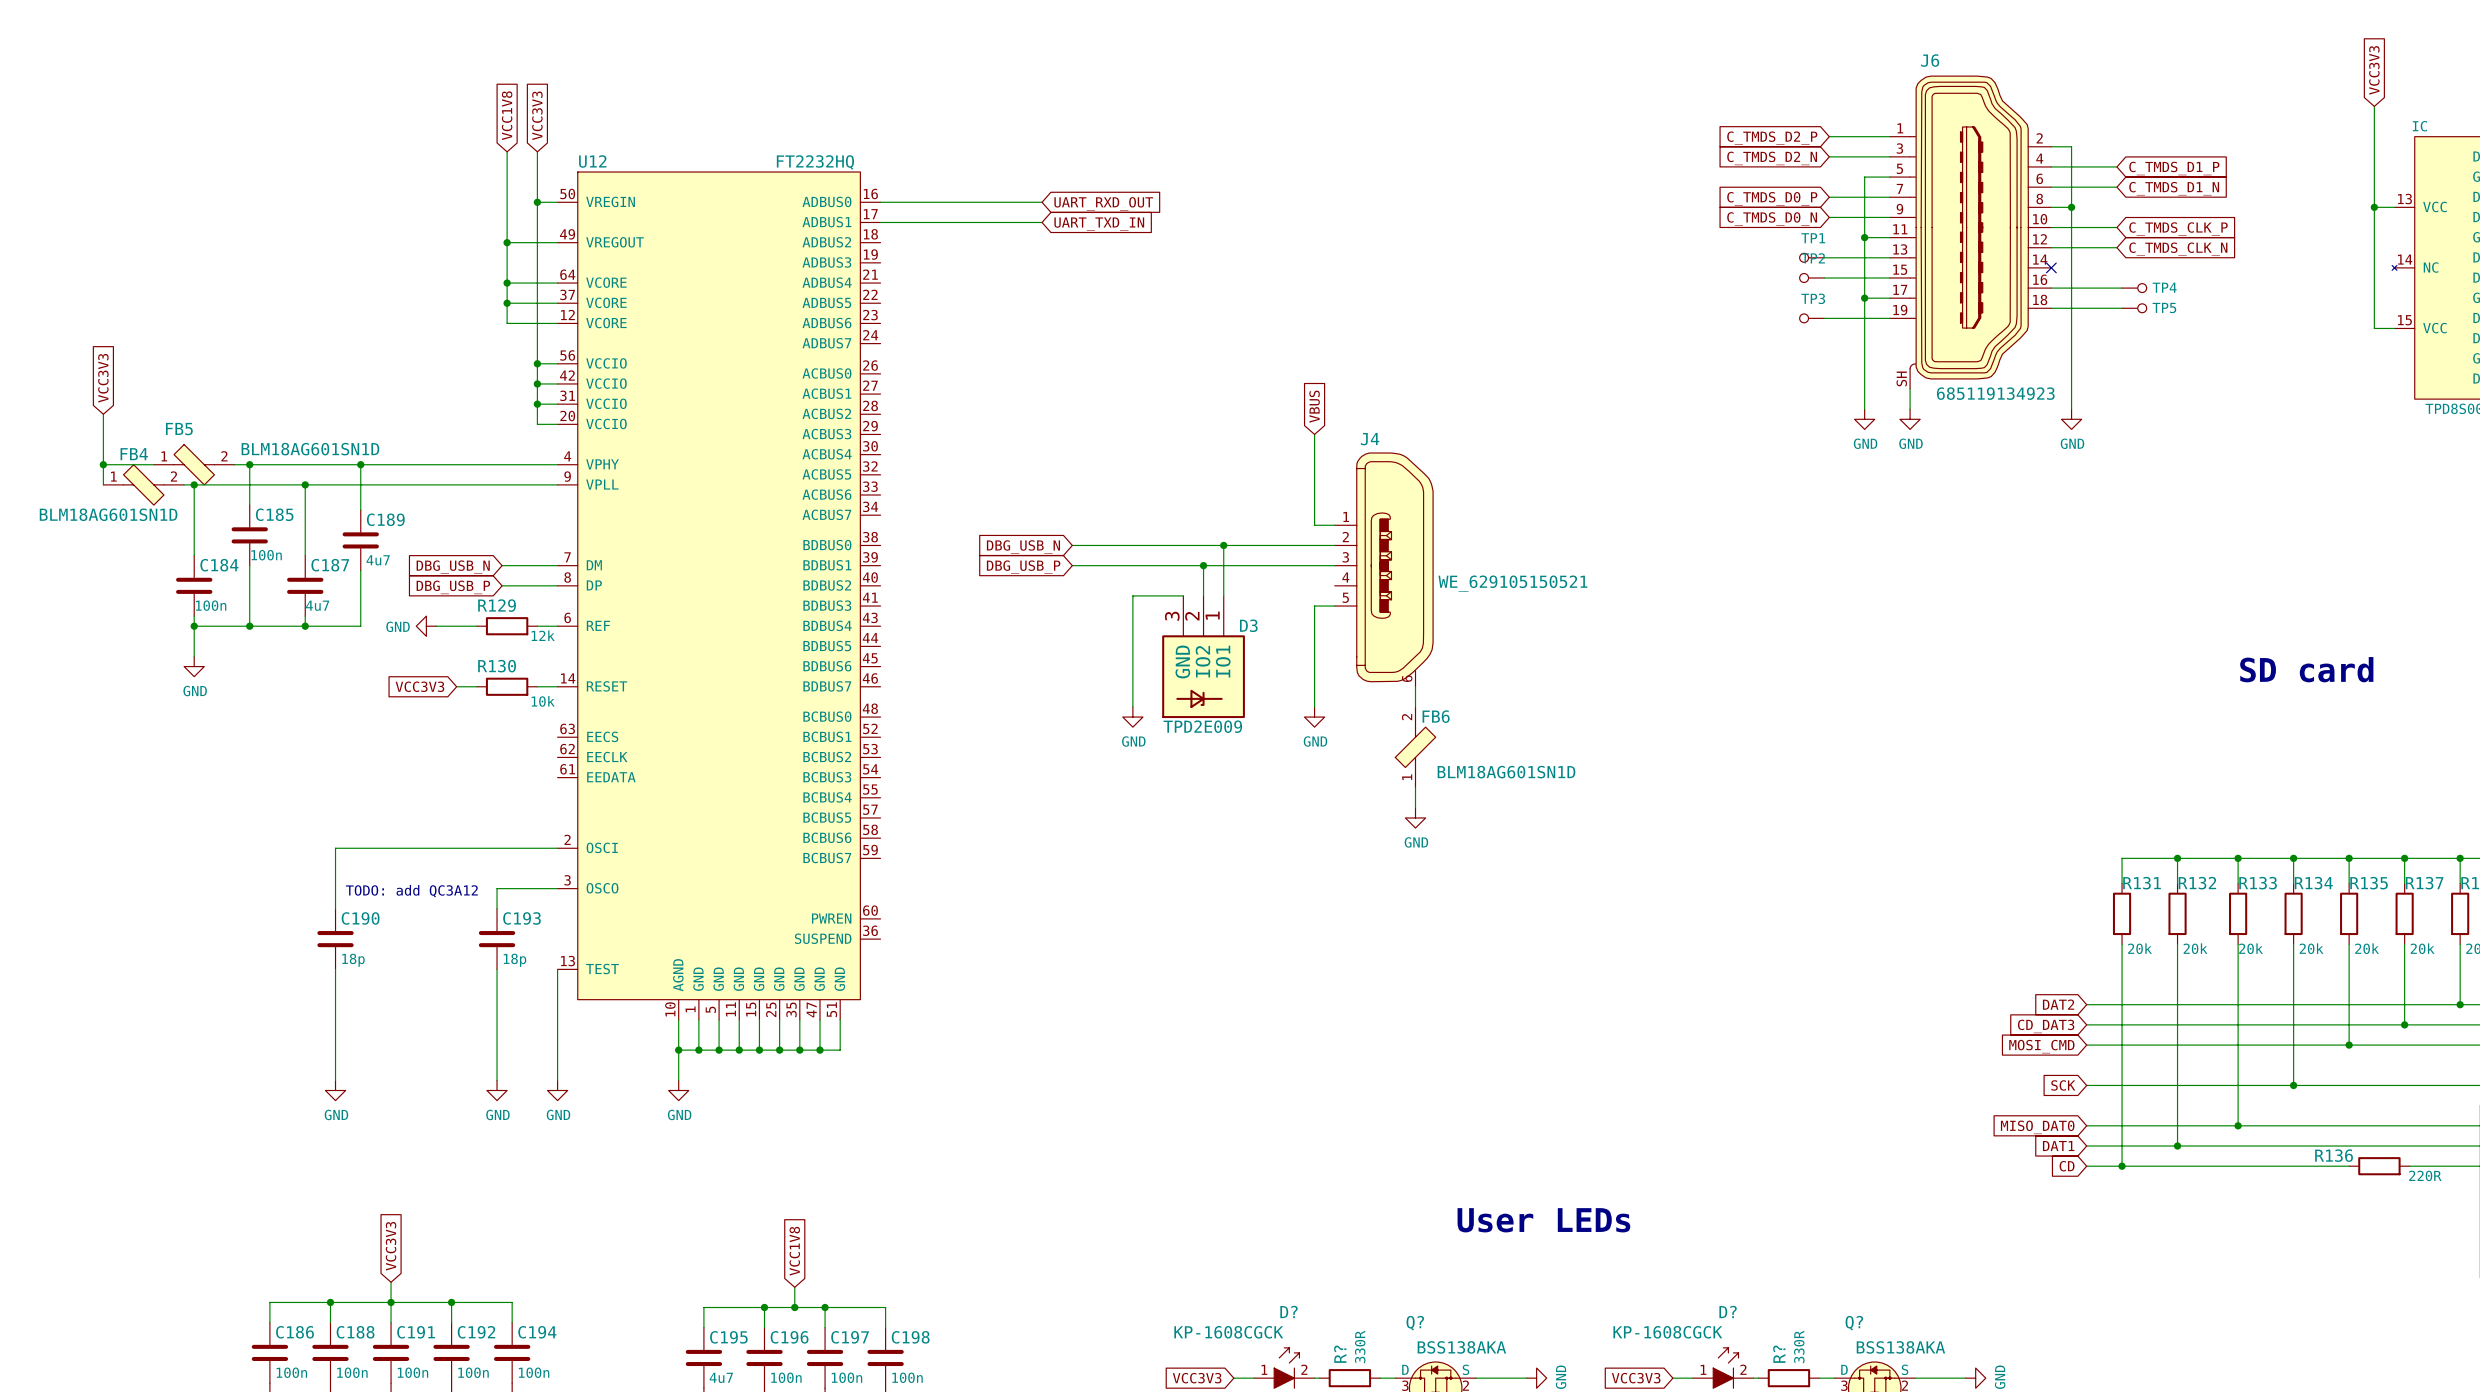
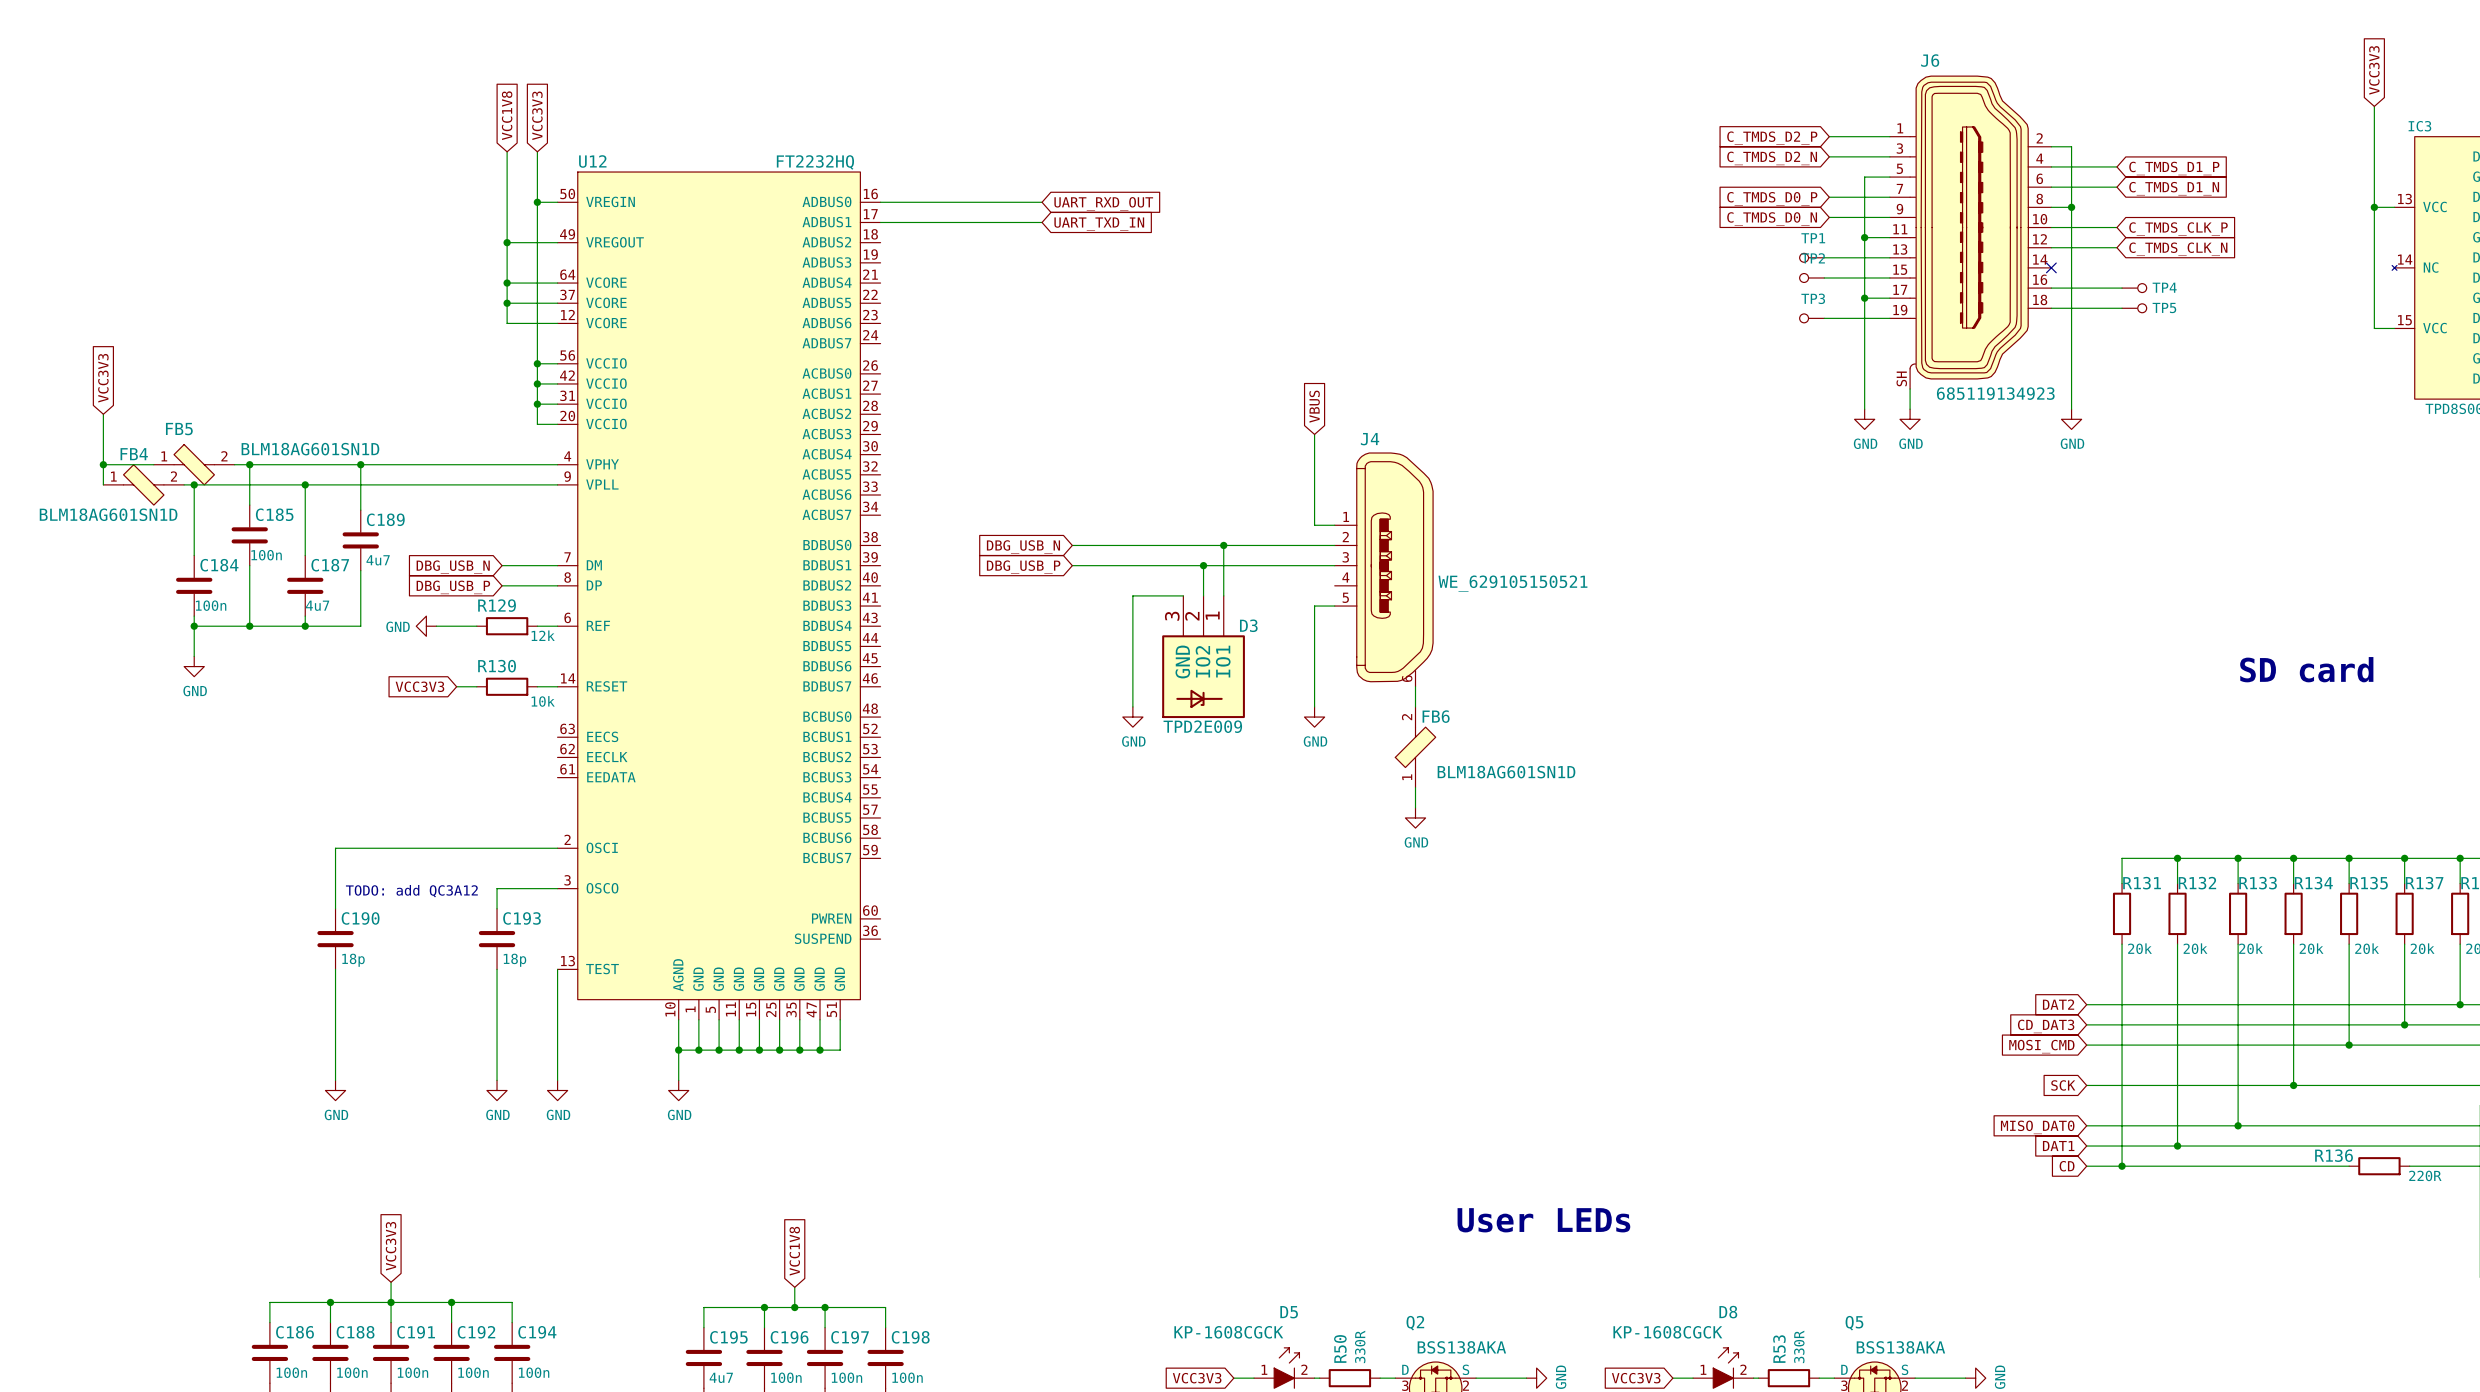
IC name: IC (2419, 126) -> IC3 (2419, 126)
D? name: D? (1289, 1311) -> D5 (1289, 1312)
D? name: D? (1728, 1311) -> D8 (1728, 1312)
Q? name: Q? (1415, 1323) -> Q2 (1415, 1323)
Q? name: Q? (1854, 1323) -> Q5 (1854, 1323)
R? name: R? (1340, 1354) -> R50 (1340, 1348)
R? name: R? (1779, 1354) -> R53 (1779, 1349)

